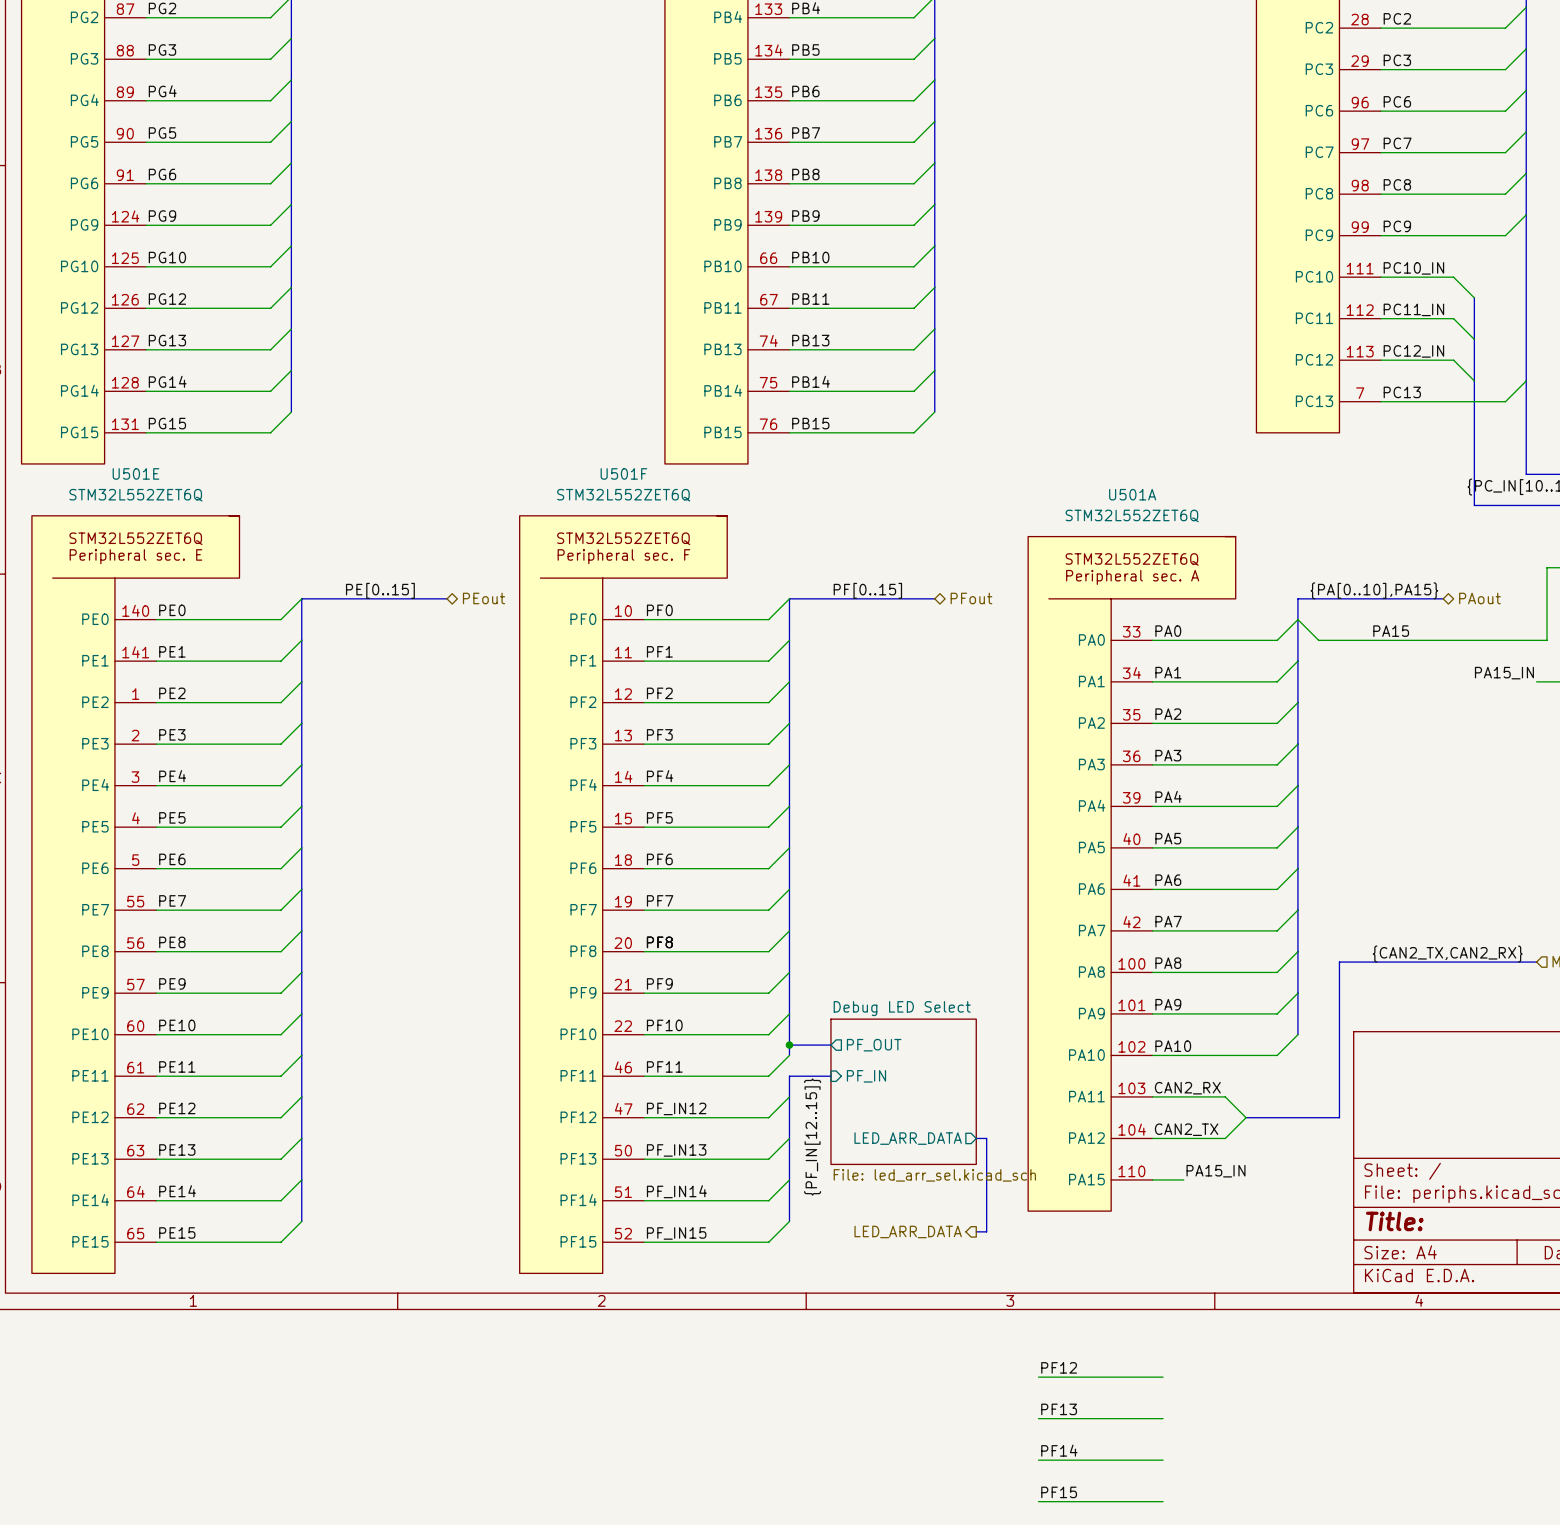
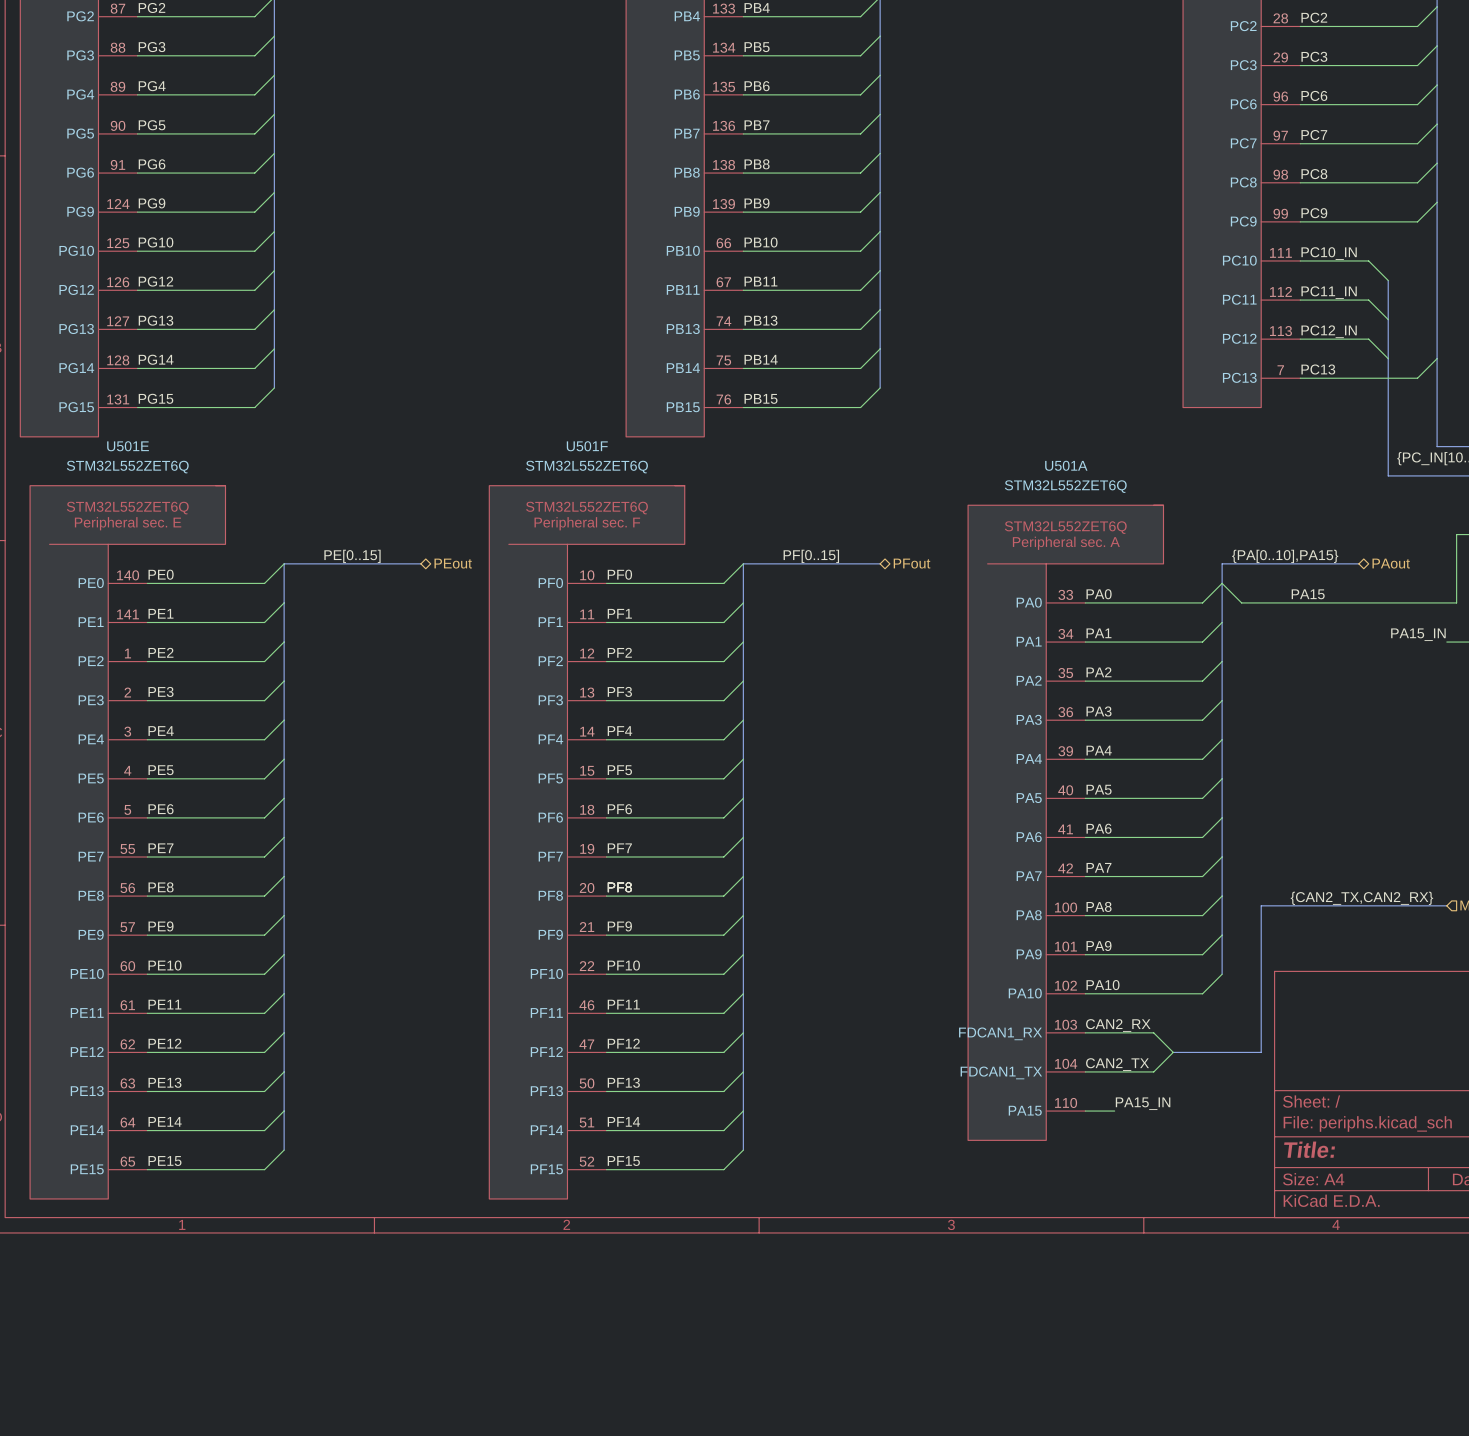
bus: (789, 1045) (830, 1045) -> none
junction: (789, 1045) -> none
sheet pin: PF_OUT (874, 1045) -> none
bus: (789, 1076) (830, 1076) -> (743, 1013) (743, 993)
sheet pin: PF_IN (866, 1076) -> none
sheet Debug LED Select: File: led_arr_sel.kicad_sch (903, 1091) -> none
U501A pin name: PA11 (1086, 1096) -> FDCAN1_RX (1000, 1033)
label: PF_IN12 (676, 1108) -> PF12 (623, 1043)
label: {PF_IN[12..15]} (812, 1137) -> none
sheet pin: LED_ARR_DATA (908, 1138) -> none
bus: (976, 1138) (986, 1138) (986, 1231) (976, 1231) -> none
U501A pin name: PA12 (1086, 1138) -> FDCAN1_TX (1001, 1072)
label: PF_IN13 (676, 1150) -> PF13 (623, 1082)
label: PF_IN14 (676, 1191) -> PF14 (623, 1121)
hierarchical label: LED_ARR_DATA (908, 1231) -> none
label: PF_IN15 (676, 1233) -> PF15 (623, 1161)
label: PF12 (1059, 1367) -> none
wire: (1038, 1377) (1163, 1377) -> none
label: PF13 (1059, 1409) -> none
wire: (1038, 1418) (1163, 1418) -> none
label: PF14 (1059, 1450) -> none
wire: (1038, 1460) (1163, 1460) -> none
label: PF15 (1059, 1492) -> none
wire: (1038, 1501) (1163, 1501) -> none

